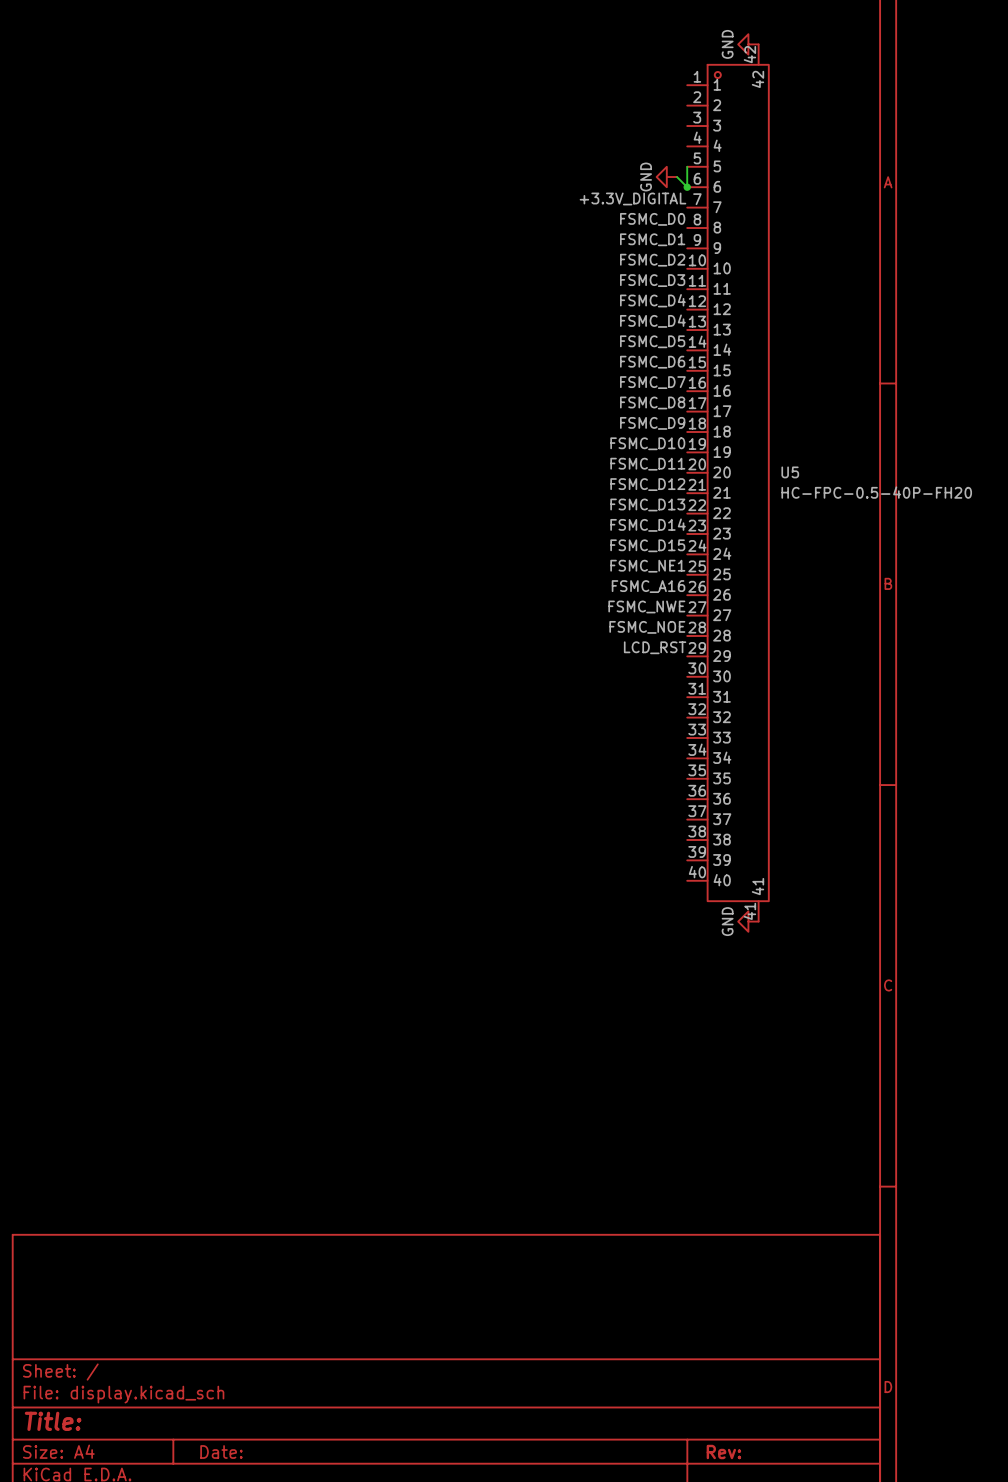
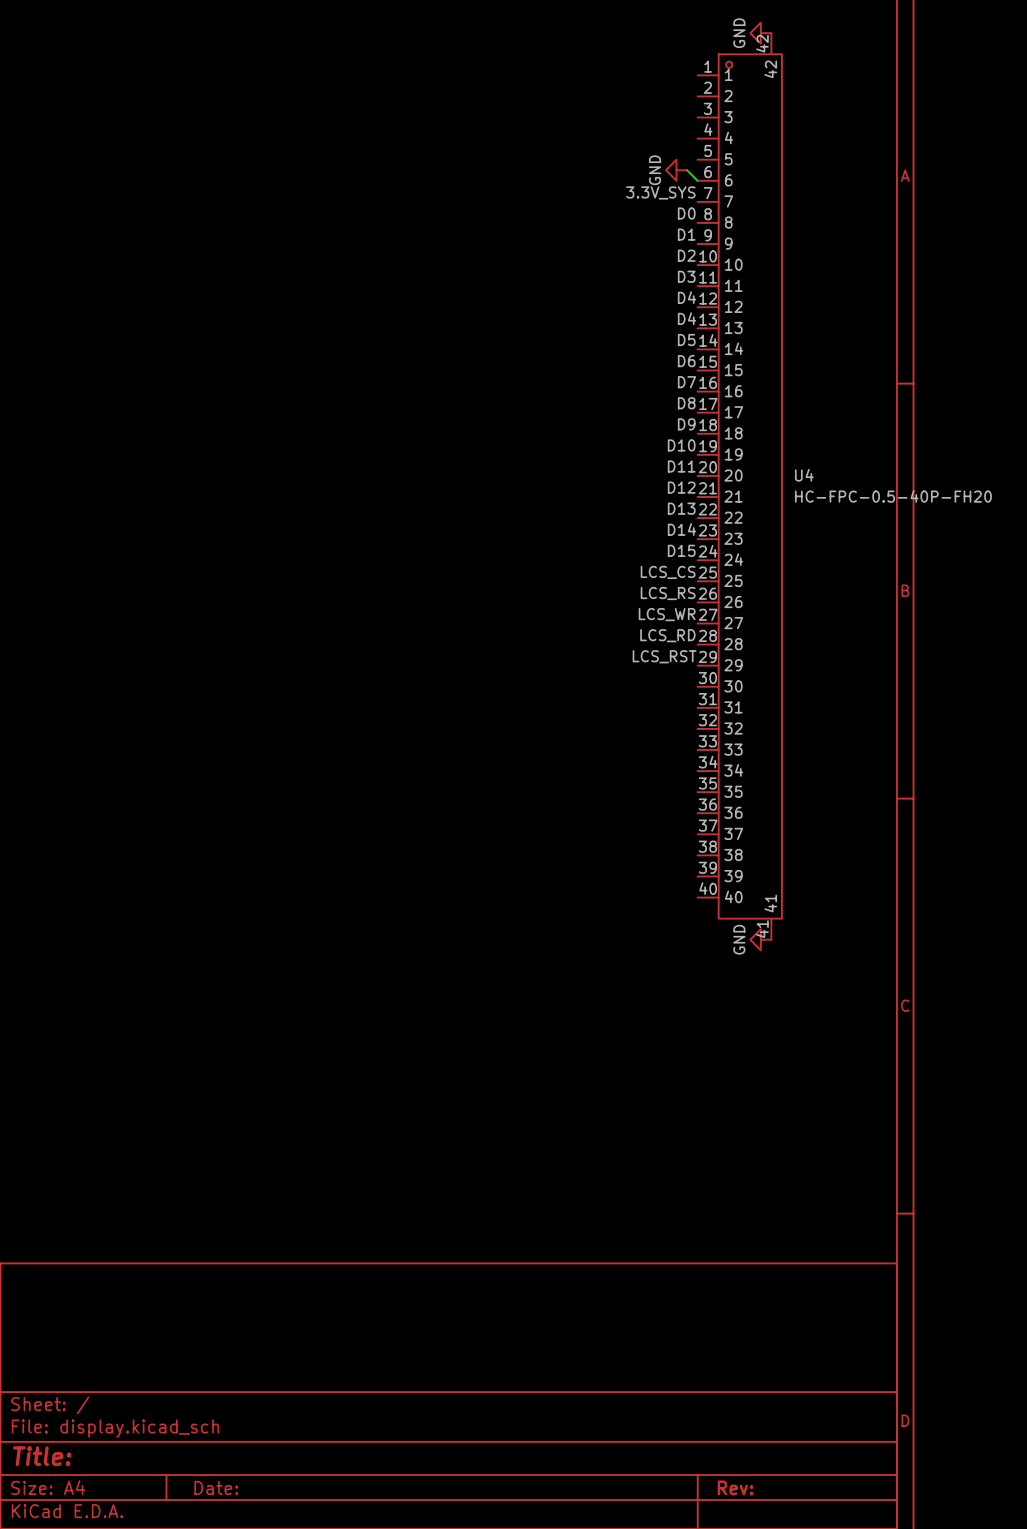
wire: (687, 166) (687, 187) -> none
junction: (687, 187) -> none
label: +3.3V_DIGITAL (632, 198) -> 3.3V_SYS (660, 192)
label: FSMC_D0 (652, 219) -> D0 (686, 213)
label: FSMC_D1 (652, 239) -> D1 (686, 234)
label: FSMC_D2 (652, 260) -> D2 (686, 255)
label: FSMC_D3 (652, 280) -> D3 (686, 276)
label: FSMC_D4 (652, 300) -> D4 (686, 297)
label: FSMC_D4 (652, 321) -> D4 (686, 318)
label: FSMC_D5 (652, 341) -> D5 (686, 340)
label: FSMC_D6 (652, 362) -> D6 (686, 361)
label: FSMC_D7 (652, 382) -> D7 (686, 382)
label: FSMC_D8 (652, 402) -> D8 (686, 403)
label: FSMC_D9 (652, 423) -> D9 (686, 424)
label: FSMC_D10 (647, 443) -> D10 (681, 445)
label: FSMC_D11 (647, 464) -> D11 (681, 466)
U5 name: U5 (790, 472) -> U4 (804, 475)
label: FSMC_D12 (647, 484) -> D12 (681, 487)
label: FSMC_D13 (647, 504) -> D13 (681, 508)
label: FSMC_D14 (648, 525) -> D14 (681, 529)
label: FSMC_D15 (647, 545) -> D15 (681, 550)
label: FSMC_NE1 (647, 566) -> LCS_CS (668, 572)
label: FSMC_A16 (648, 586) -> LCS_RS (668, 593)
label: FSMC_NWE (646, 606) -> LCS_WR (667, 614)
label: FSMC_NOE (647, 627) -> LCS_RD (667, 635)
label: LCD_RST (655, 647) -> LCS_RST (664, 656)

